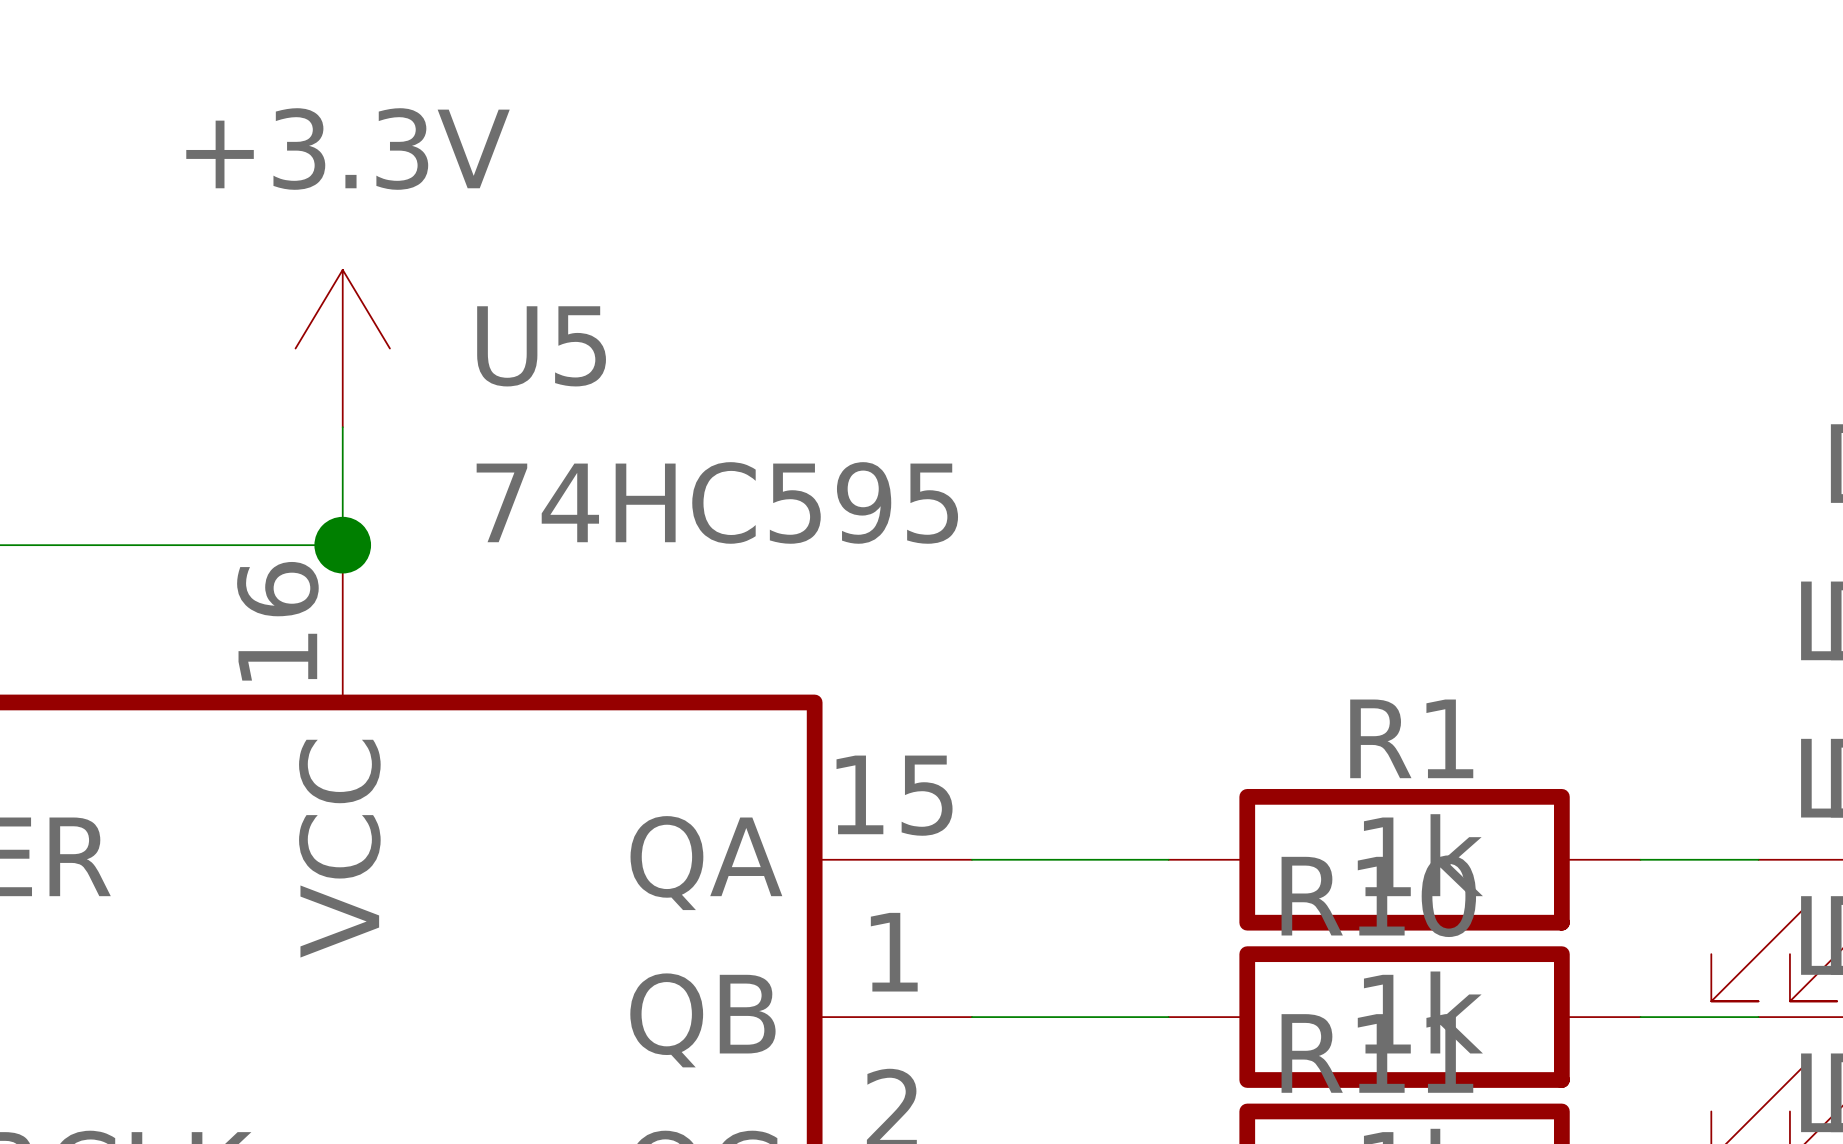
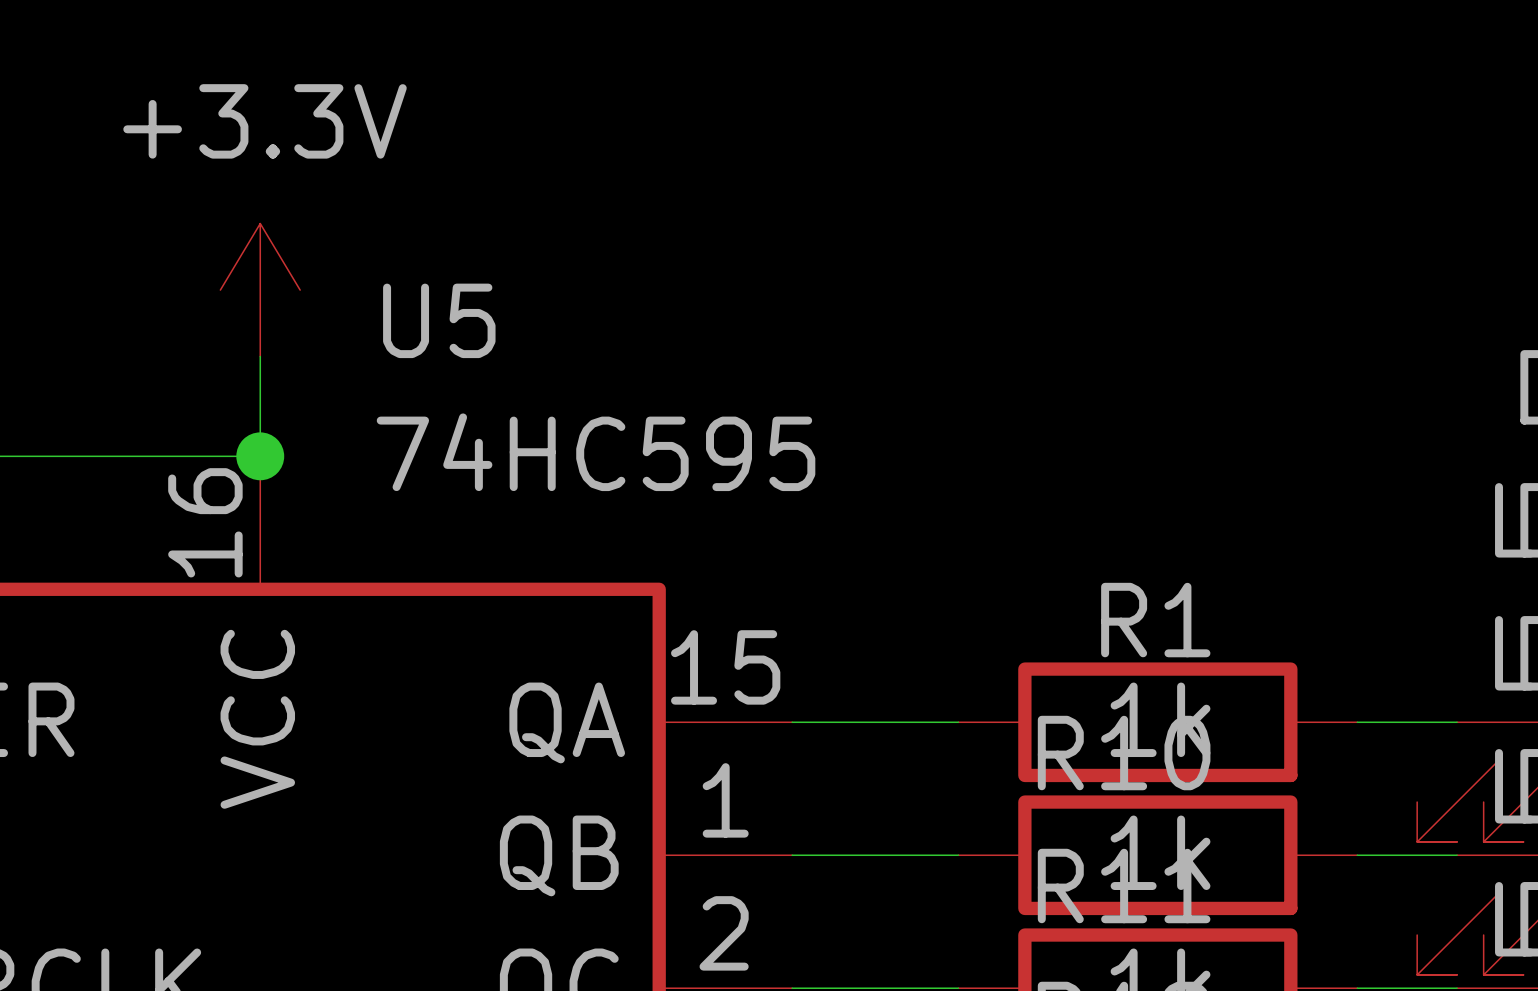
U5 name position: U5 (541, 346) -> U5 (439, 320)
U5 value position: 74HC595 (717, 502) -> 74HC595 (596, 452)

